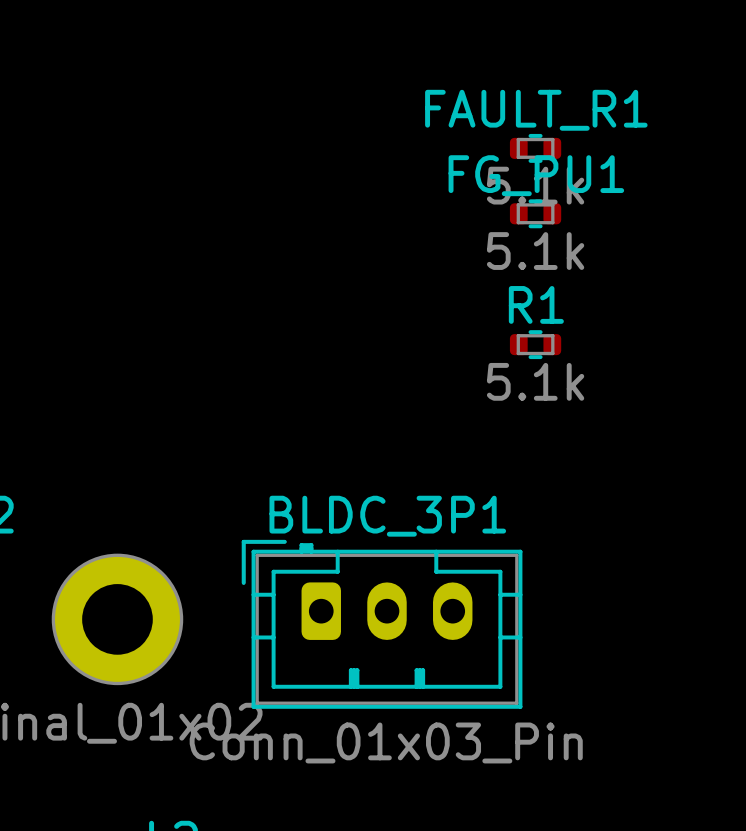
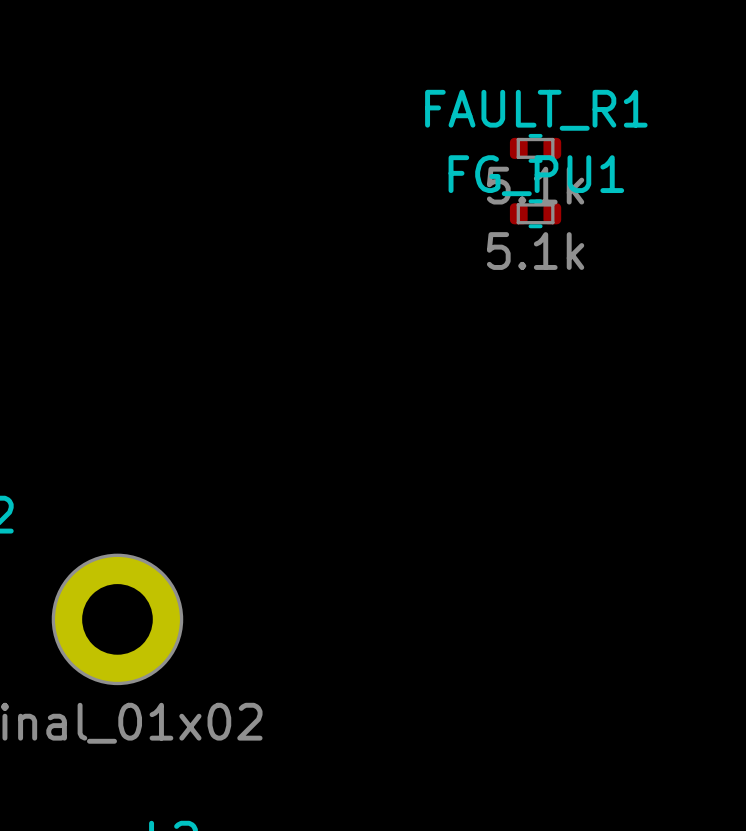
R1: 5.1k (535, 344) -> none
BLDC_3P1: Conn_01x03_Pin (382, 624) -> none

